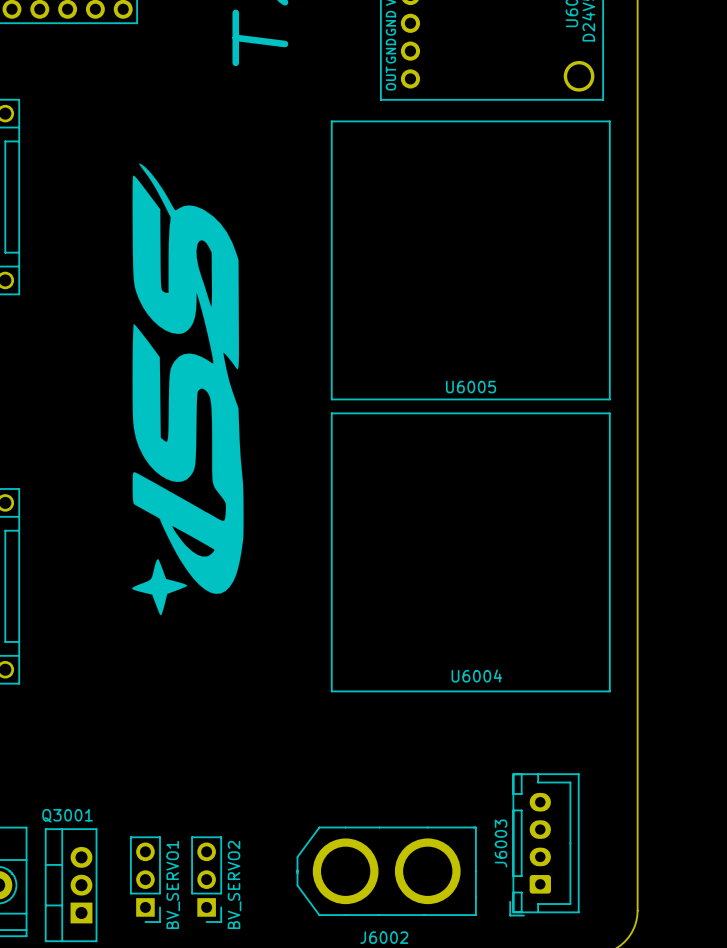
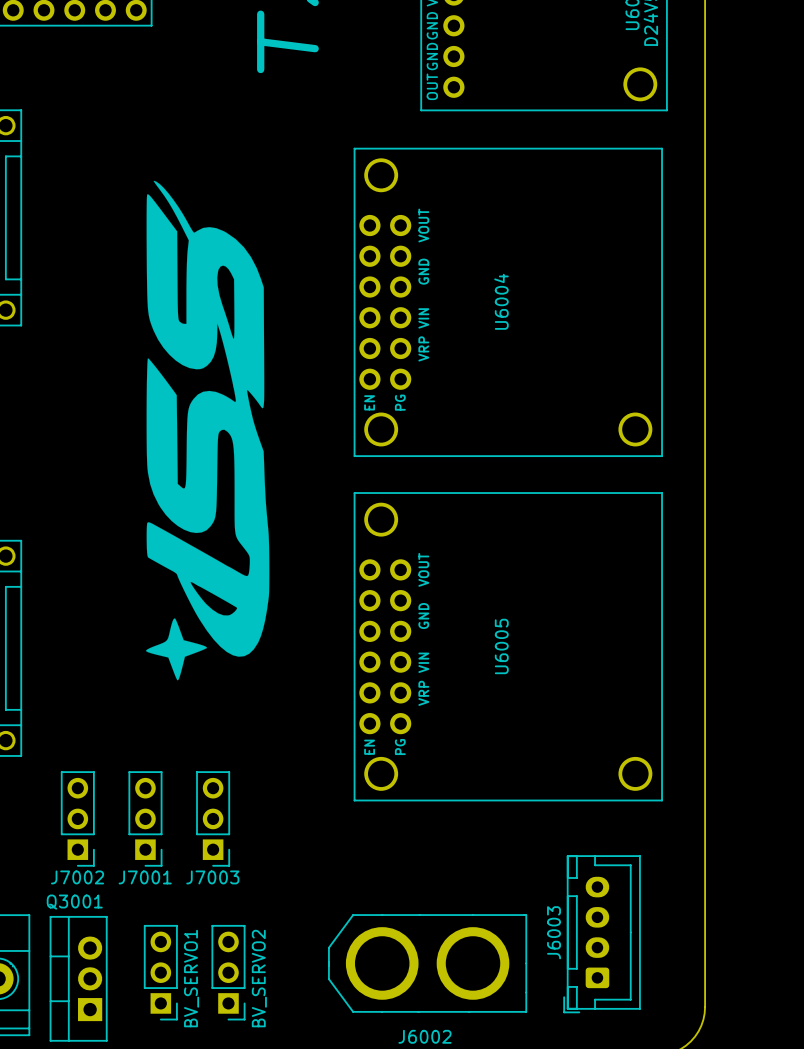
U6005 footprint: [331, 120, 611, 401] -> [353, 400, 755, 802]
U6005 name position: U6005 (471, 387) -> U6005 (501, 646)
U6004 footprint: [331, 412, 611, 693] -> [353, 55, 755, 457]
U6004 name position: U6004 (476, 675) -> U6004 (501, 301)
J7002: none -> (77, 818)
J7001: none -> (145, 818)
J7003: none -> (213, 818)

